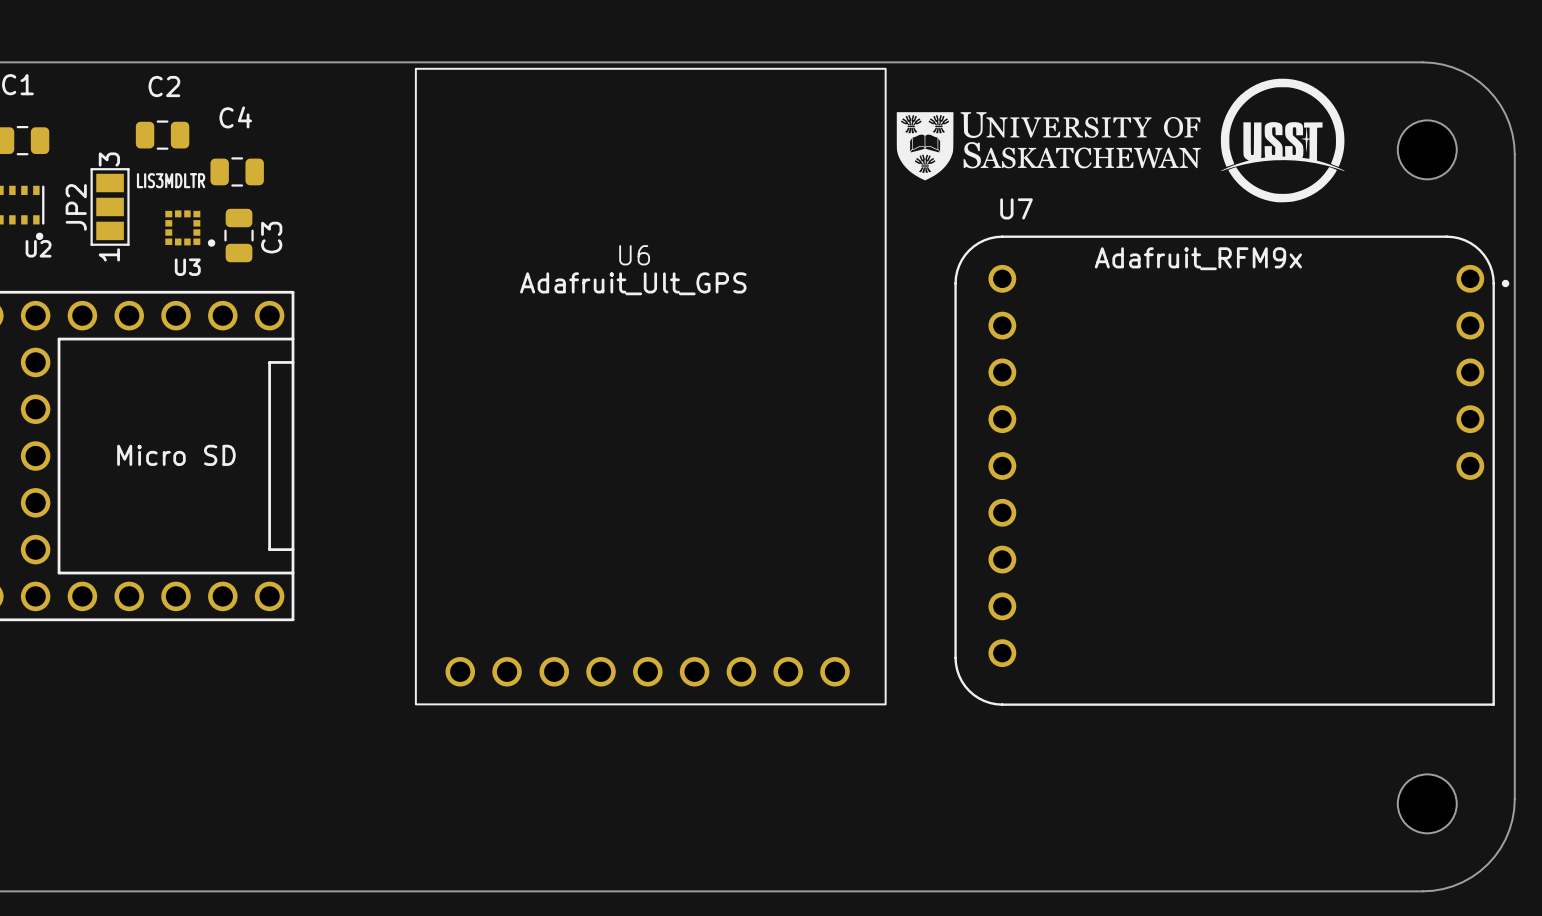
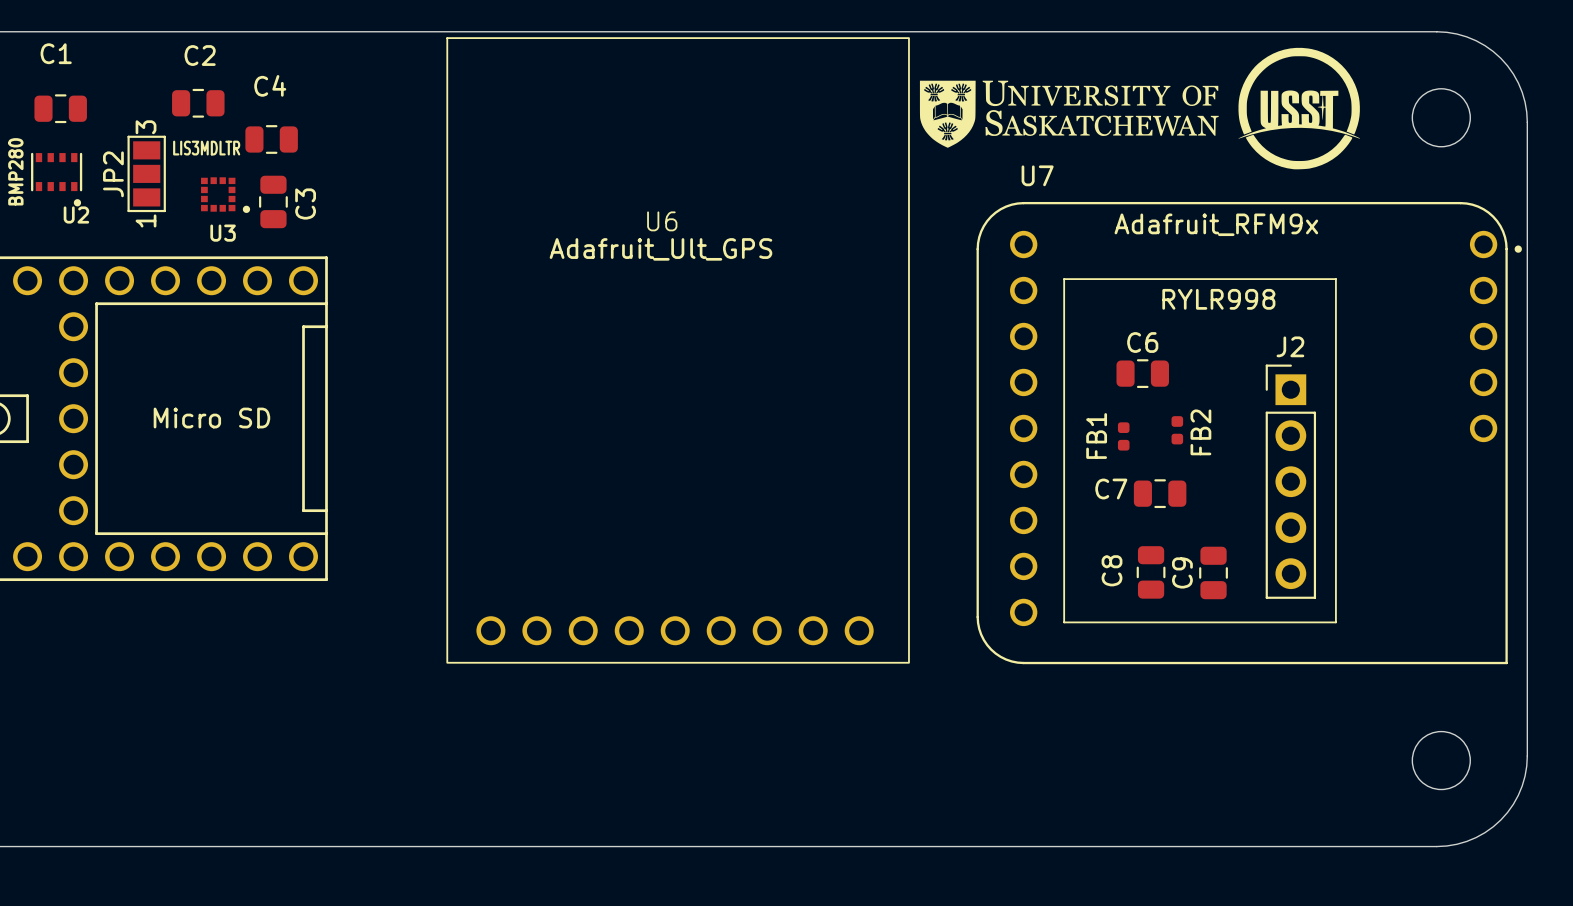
line: none -> (1064, 279) (1335, 279) (1335, 622) (1064, 622) (1064, 279)
text: none -> RYLR998 (1218, 299)
C6: none -> (1142, 373)
FB2: none -> (1177, 430)
FB1: none -> (1123, 436)
J2: none -> (1290, 481)
C7: none -> (1160, 493)
C8: none -> (1151, 572)
C9: none -> (1213, 572)

